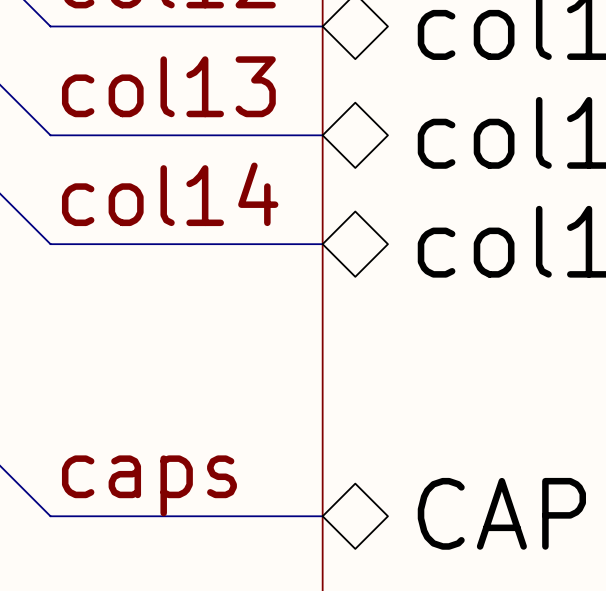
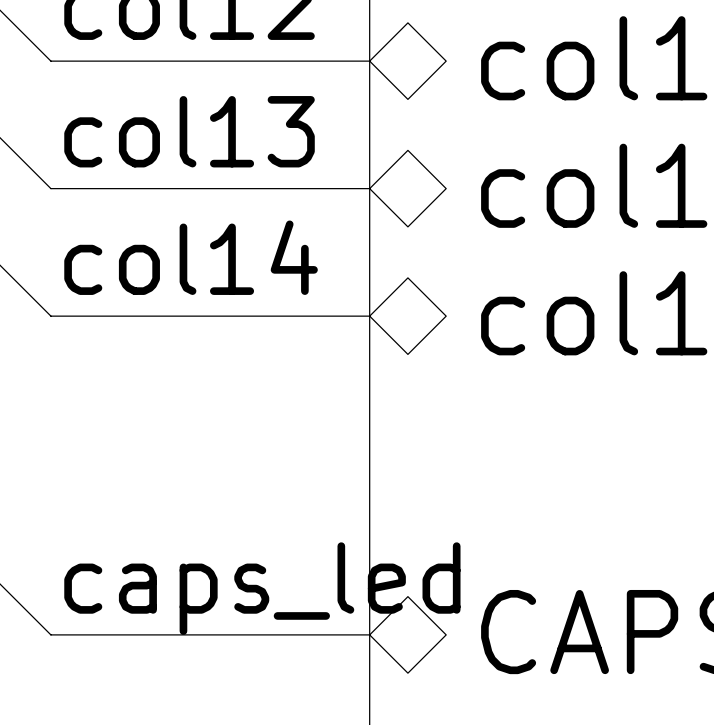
label: caps (149, 485) -> caps_led (262, 588)

